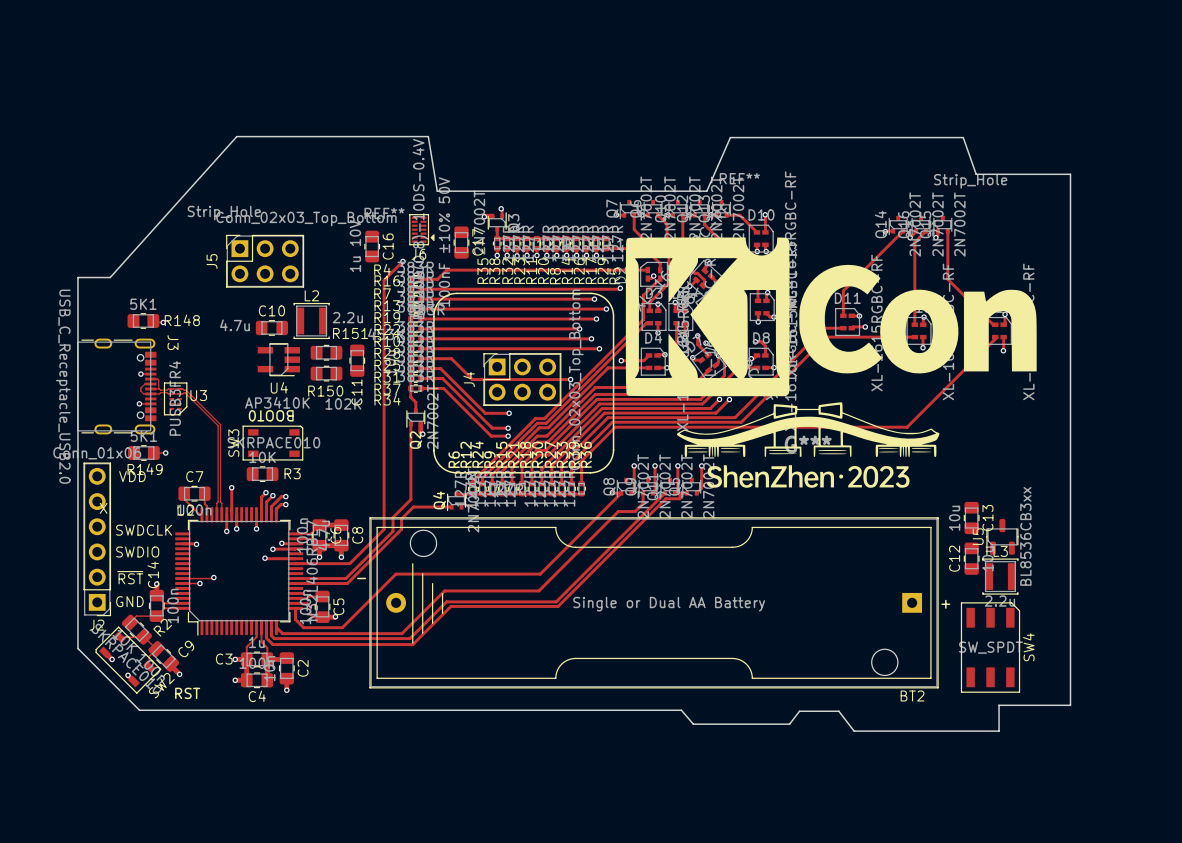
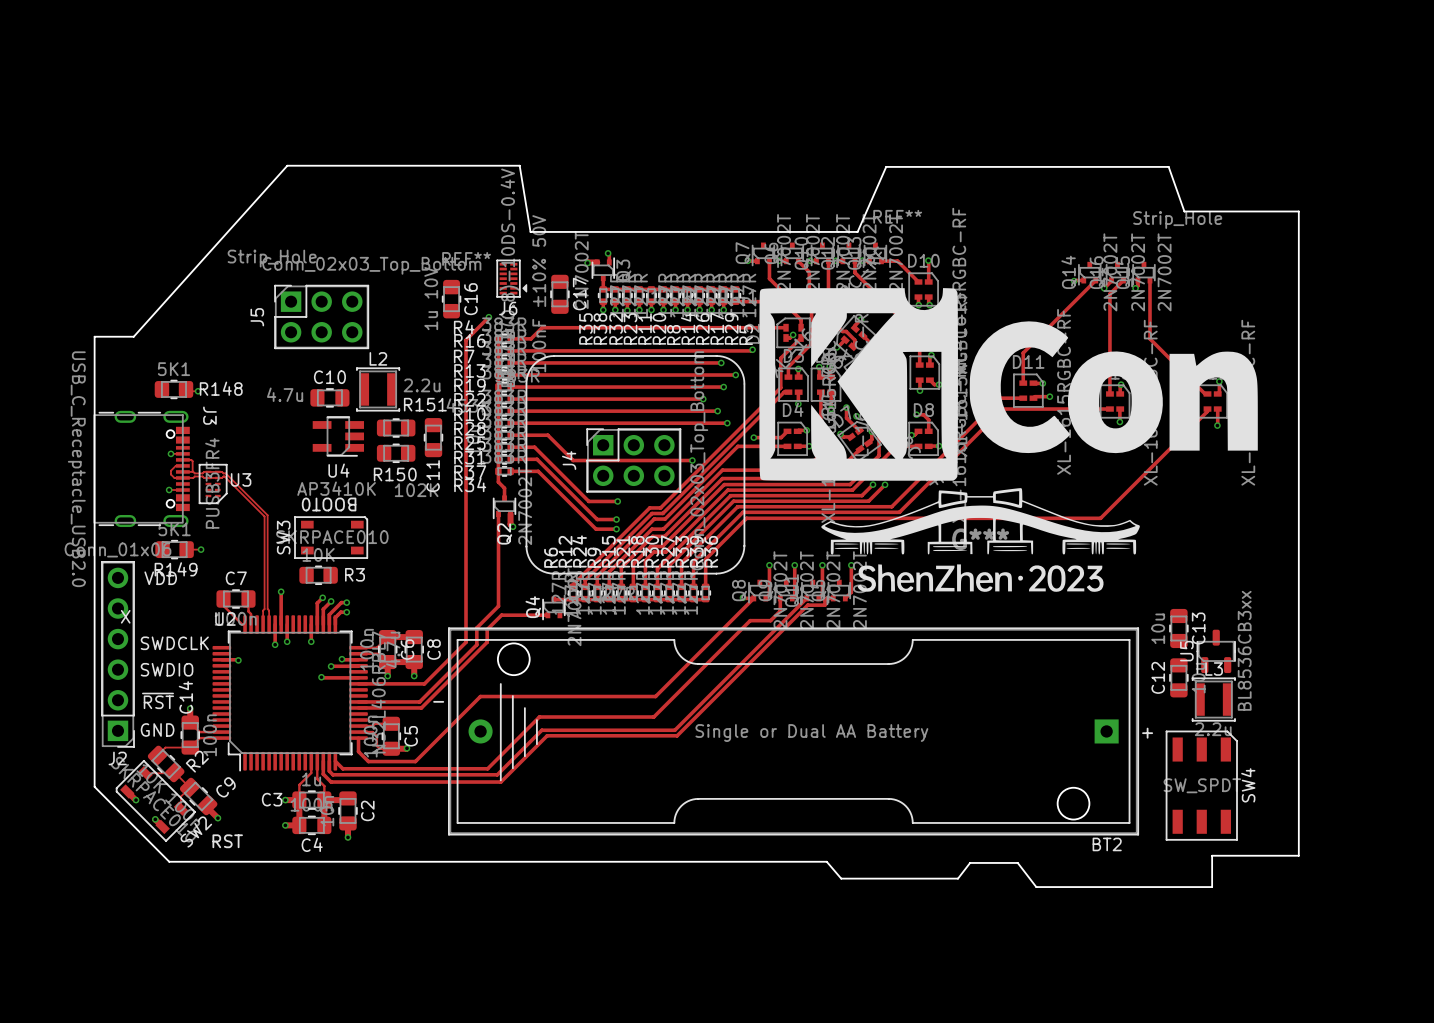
track: (213, 577) (182, 578) -> none
via: (213, 577) -> none
via: (199, 583) -> none
track: (200, 583) (182, 583) -> none

